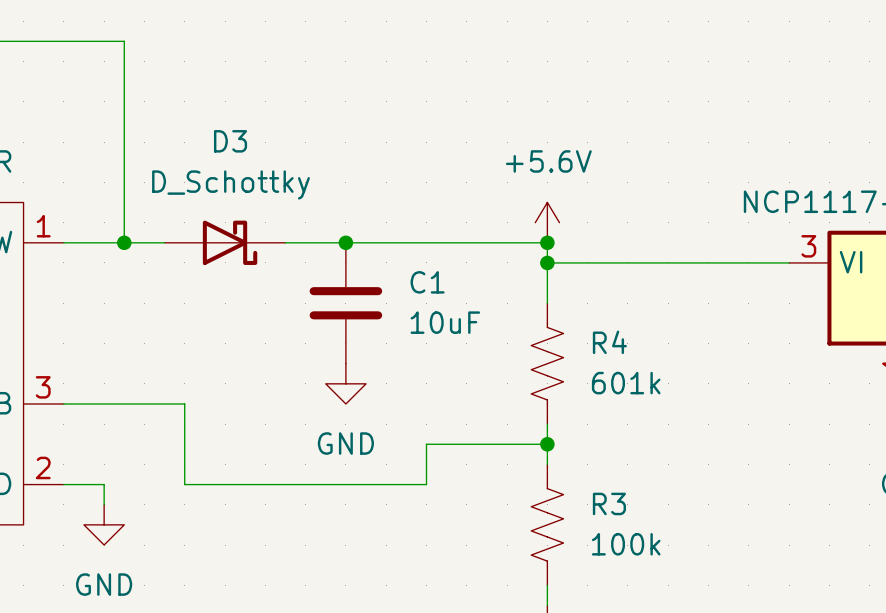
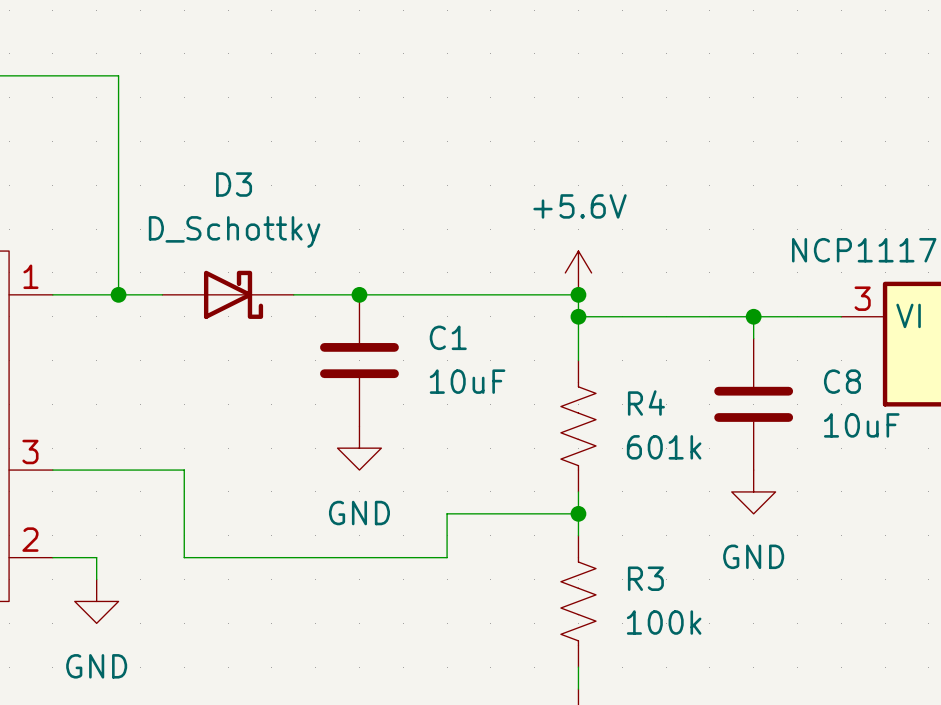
wire: none -> (753, 316) (753, 338)
junction: none -> (753, 316)
C8: none -> 10uF (753, 404)
power symbol: none -> GND (753, 491)

